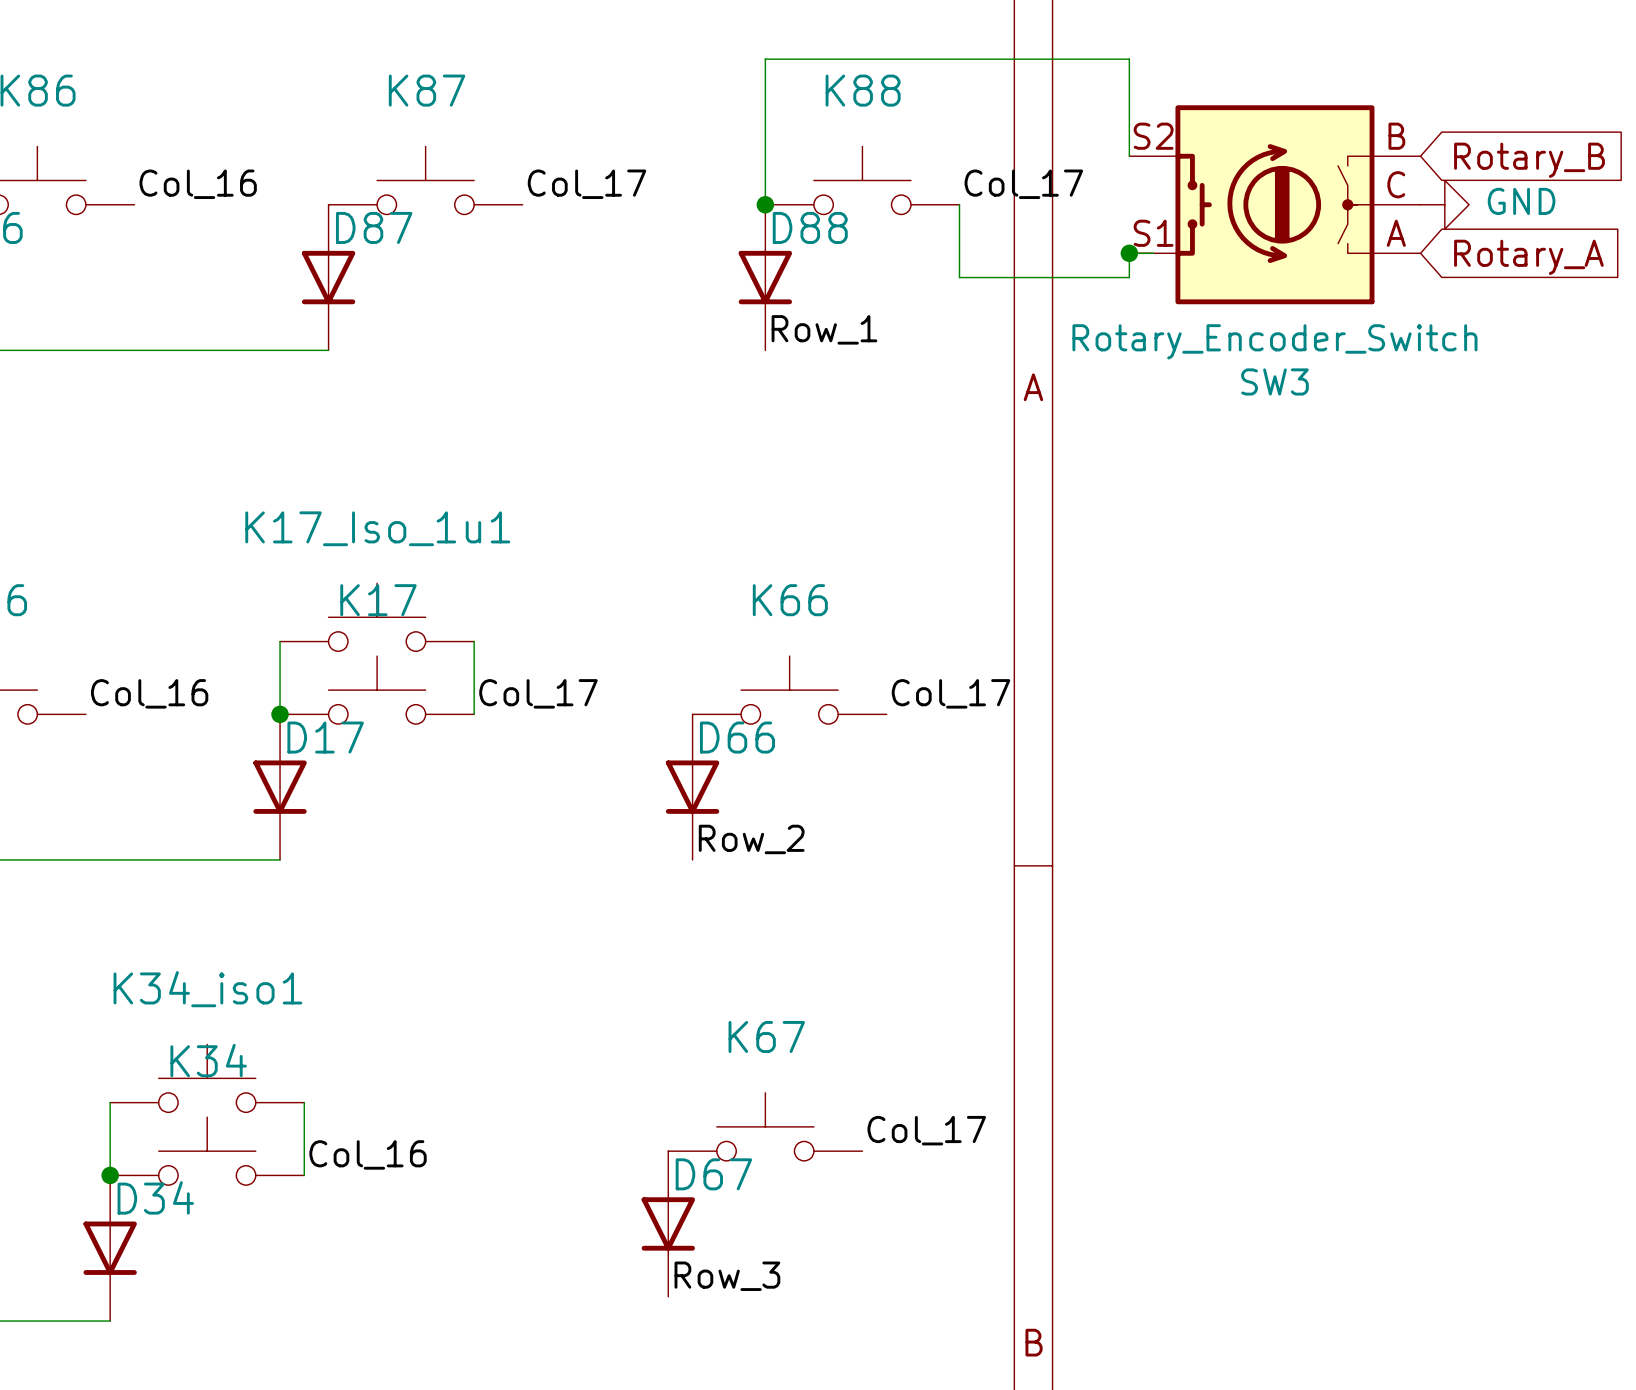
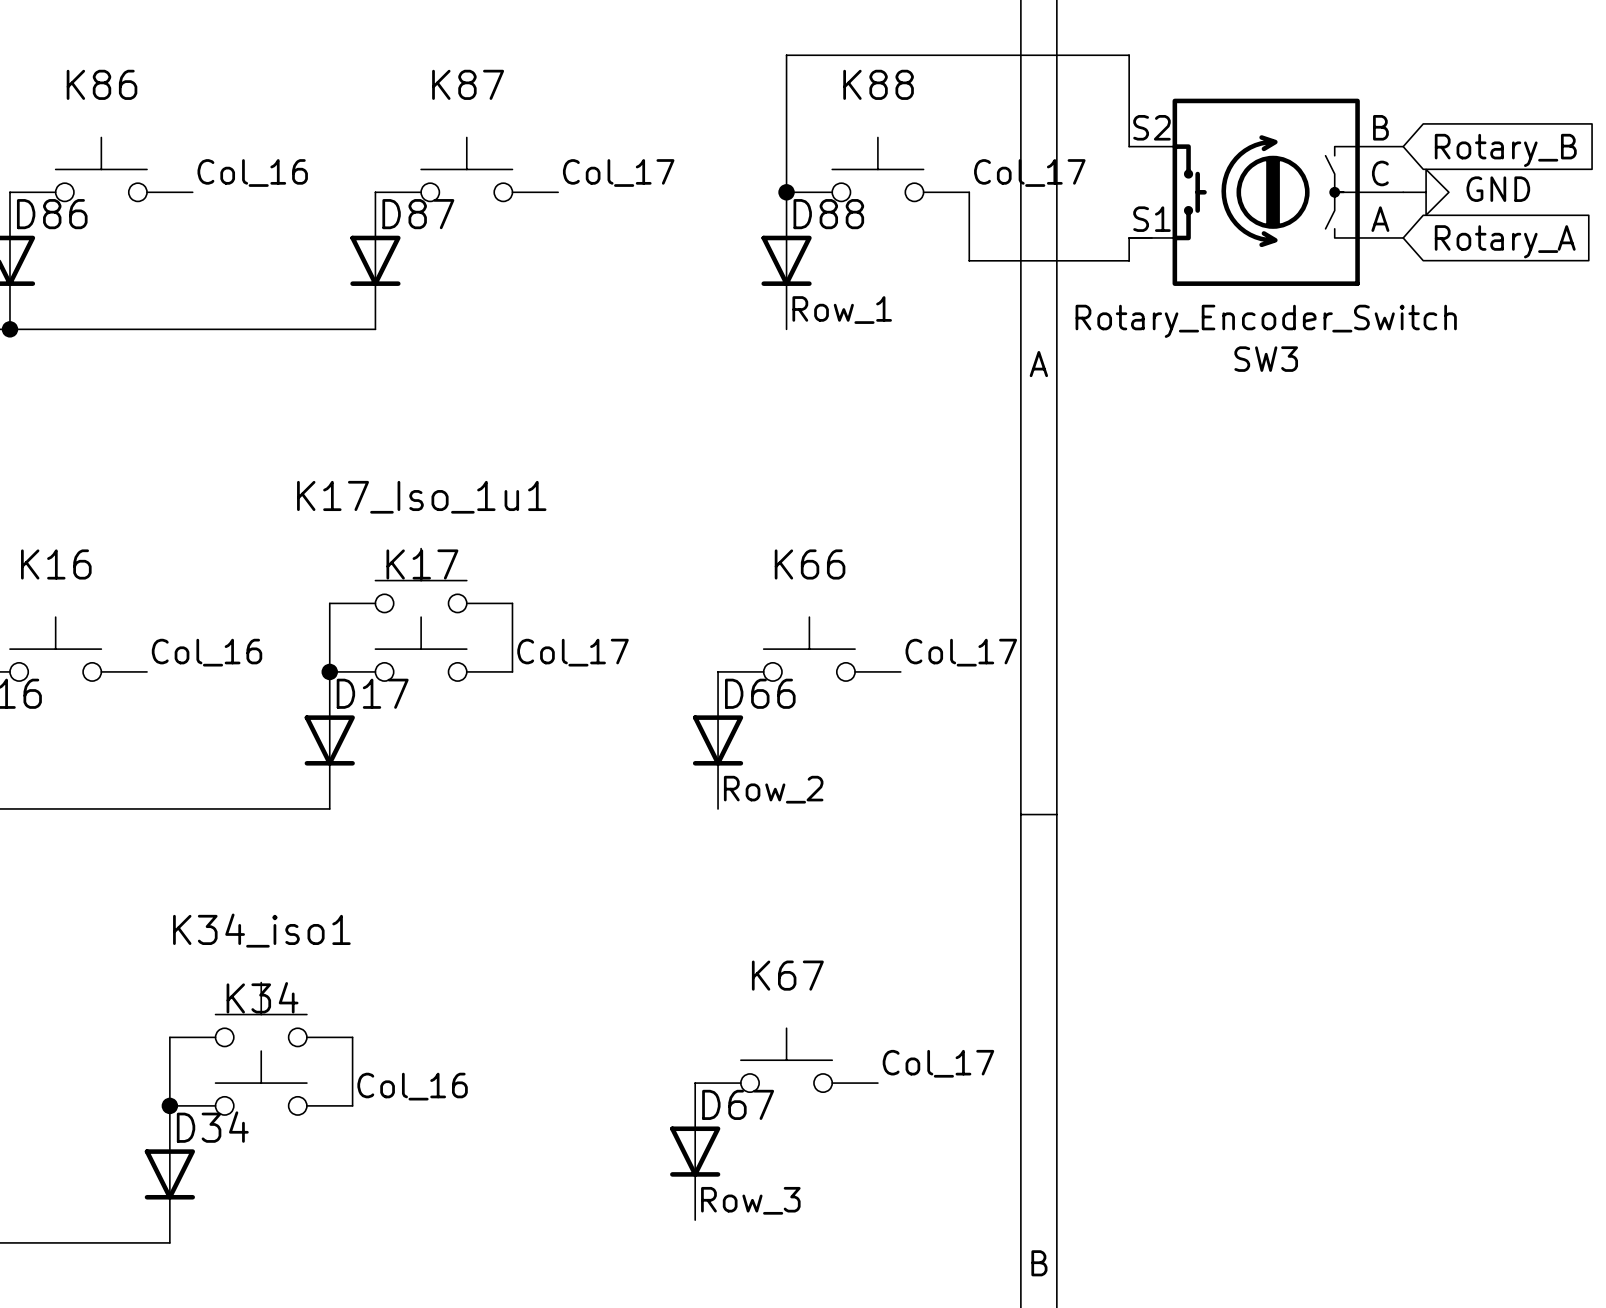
junction: (1129, 253) -> none

